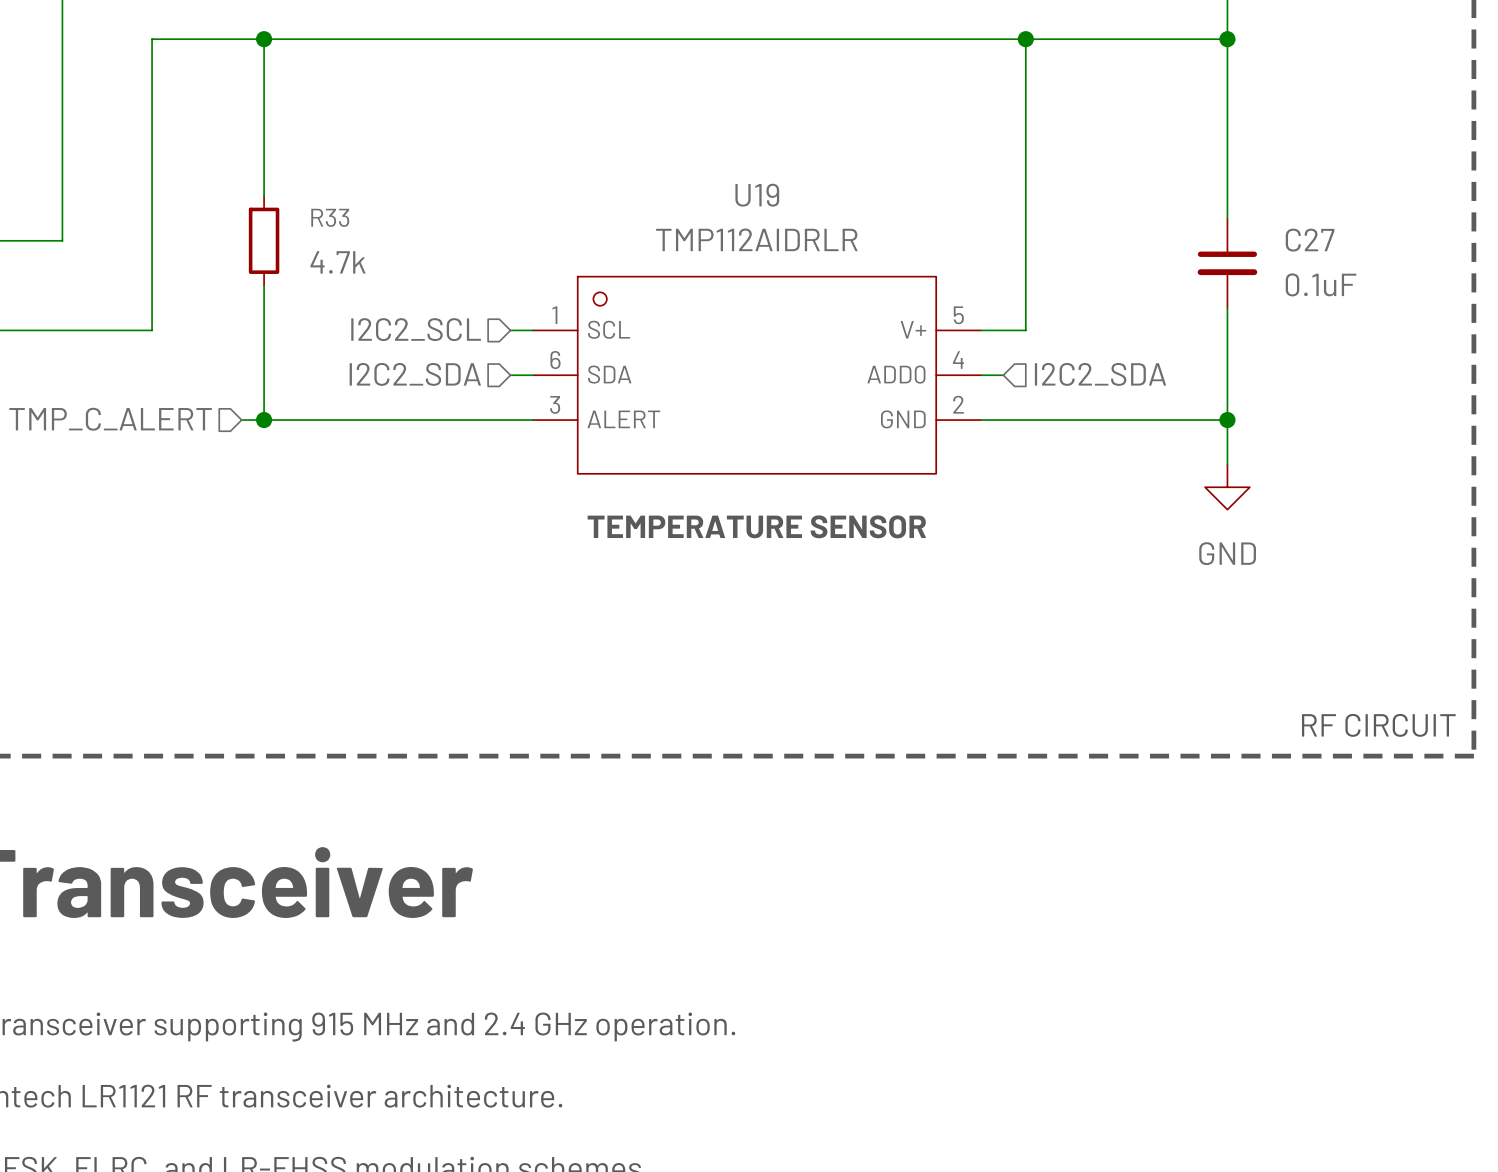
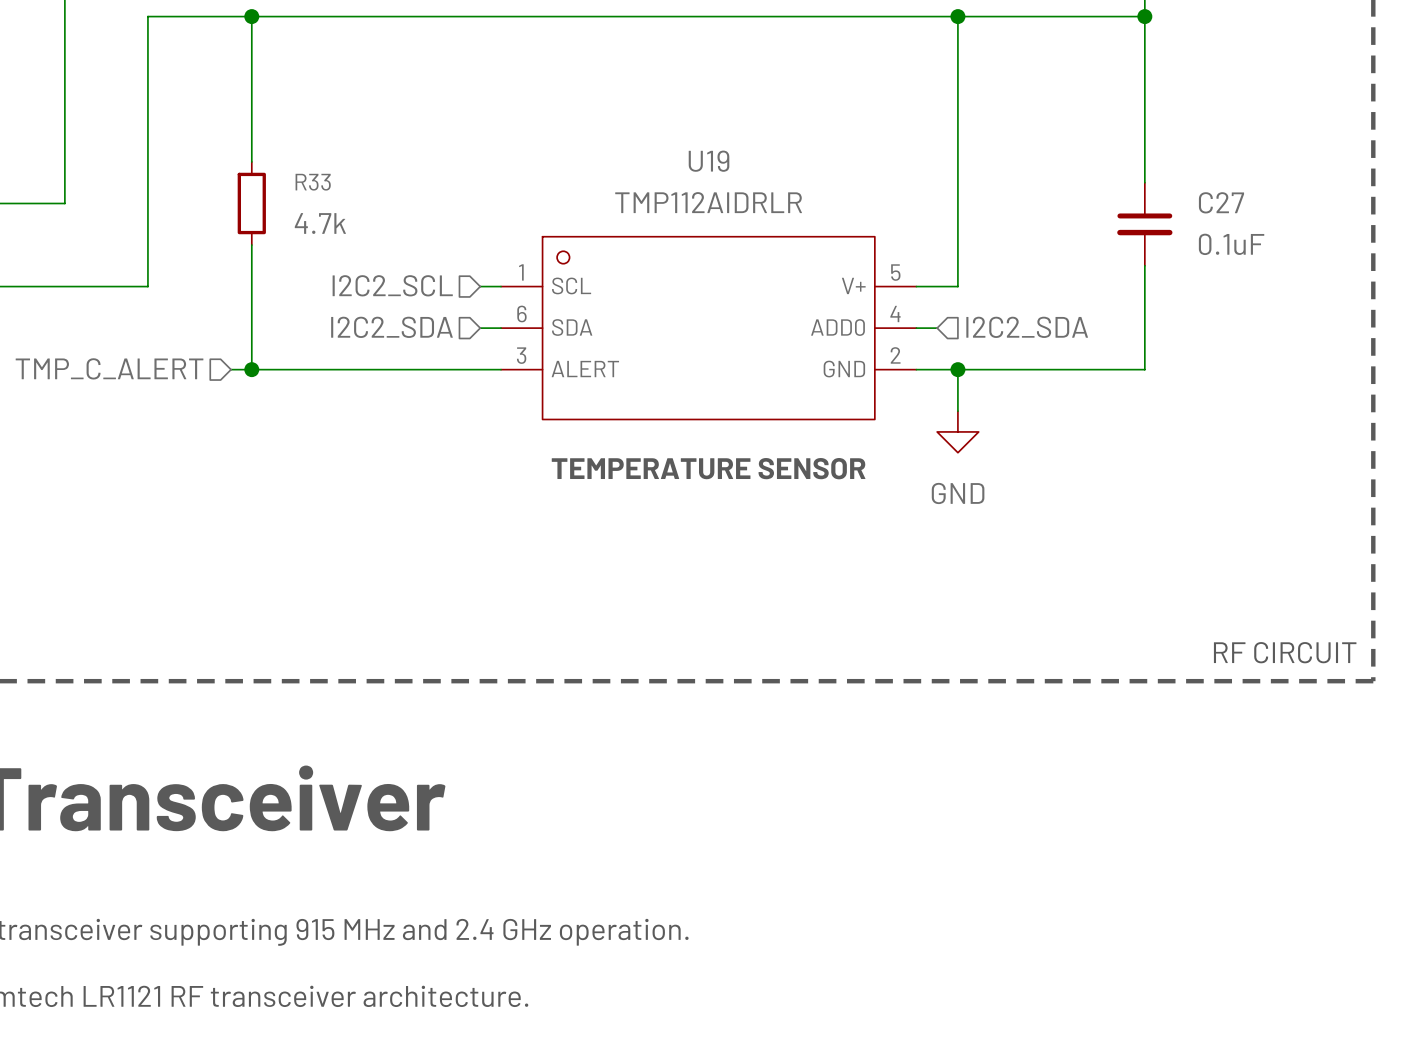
junction: none -> (957, 369)
wire: (1227, 420) (1227, 464) -> (957, 369) (957, 411)
junction: (1227, 420) -> none
power symbol position: GND (1227, 487) -> GND (957, 431)

